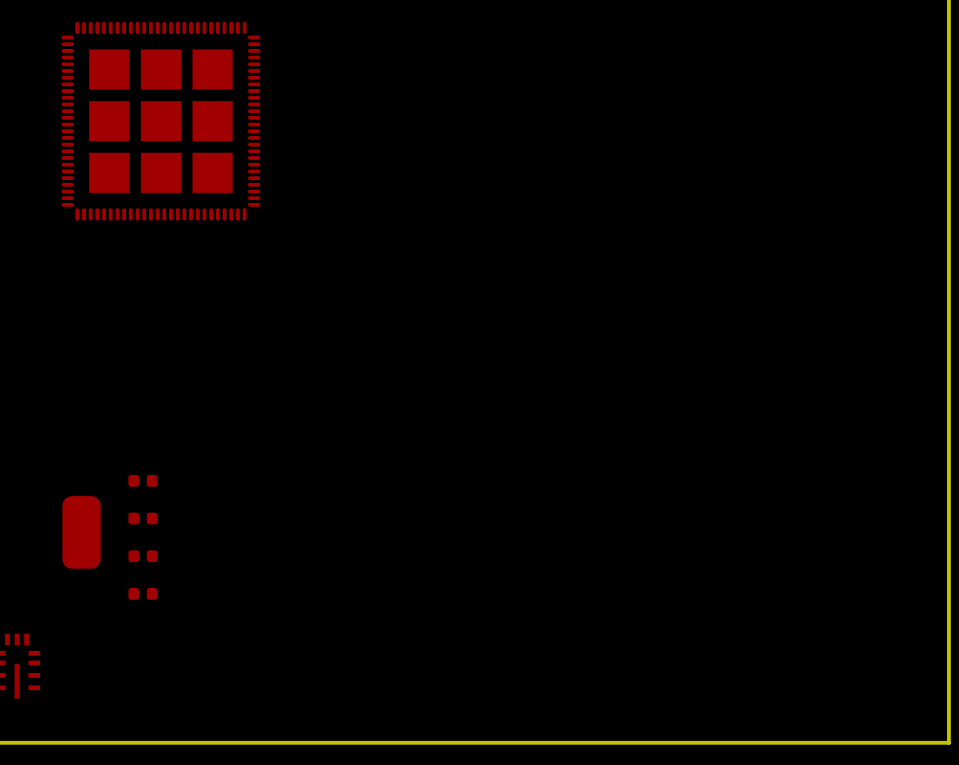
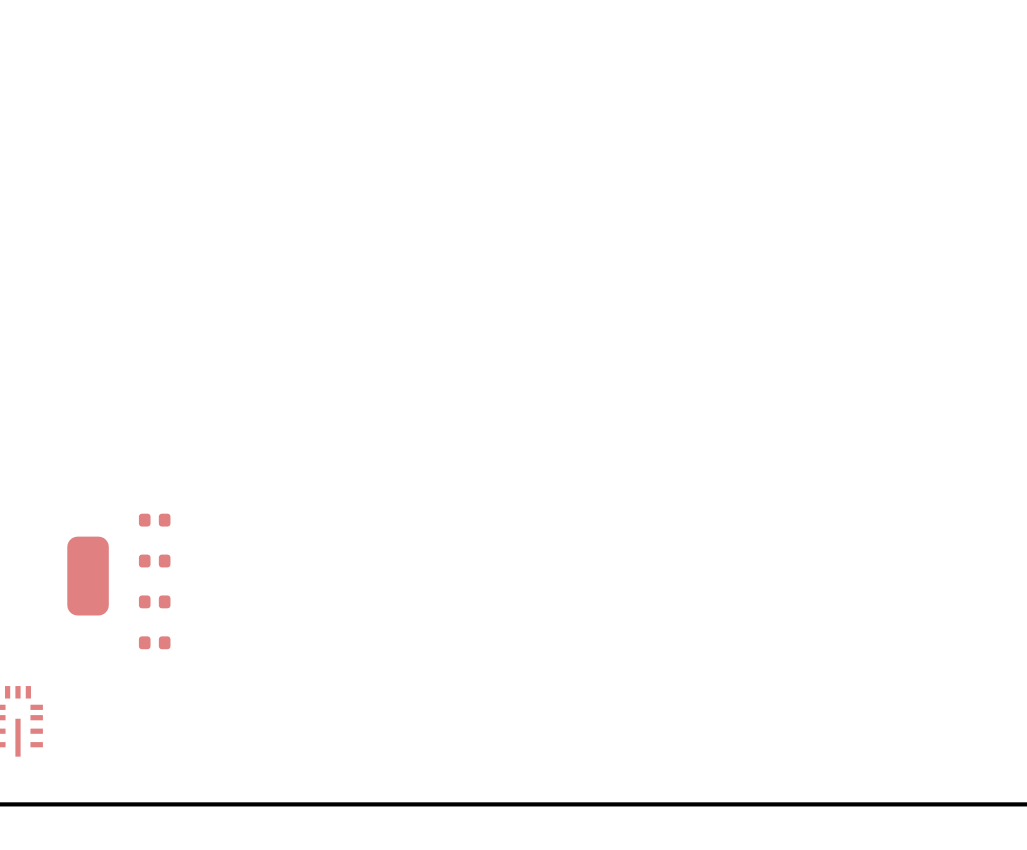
part: (160, 121) -> none

